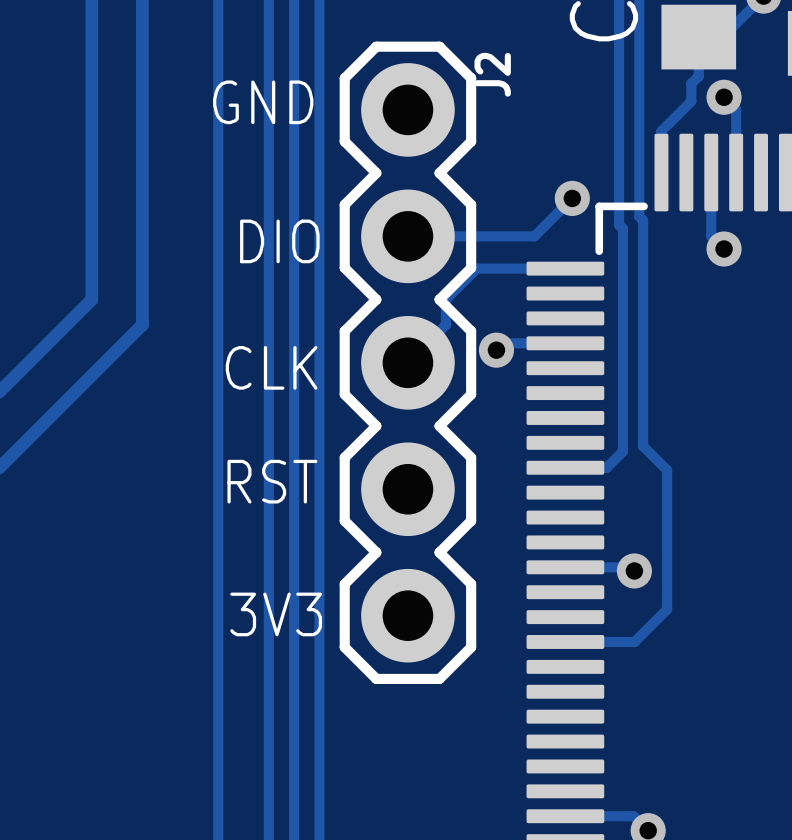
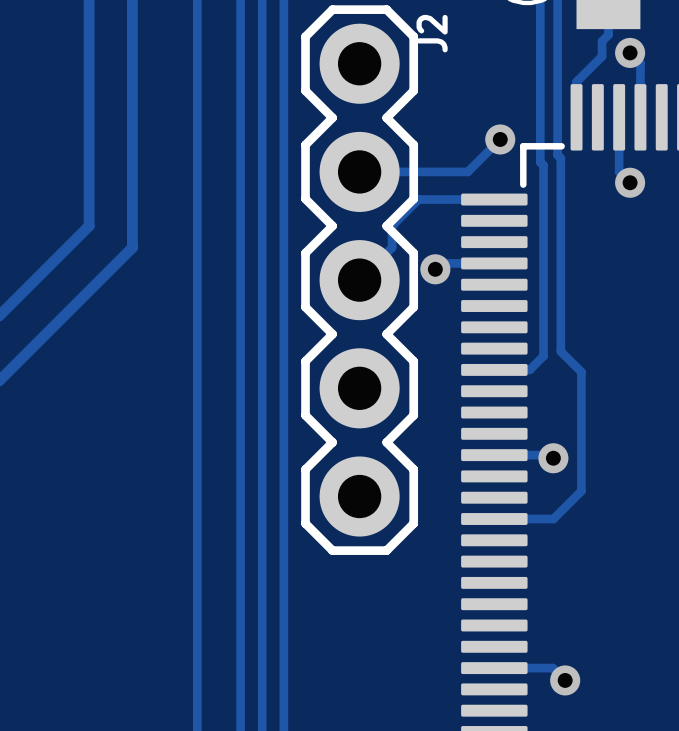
text: GND (263, 102) -> none
text: DIO (279, 241) -> none
text: CLK (271, 367) -> none
text: RST (272, 481) -> none
text: 3V3 (276, 614) -> none

